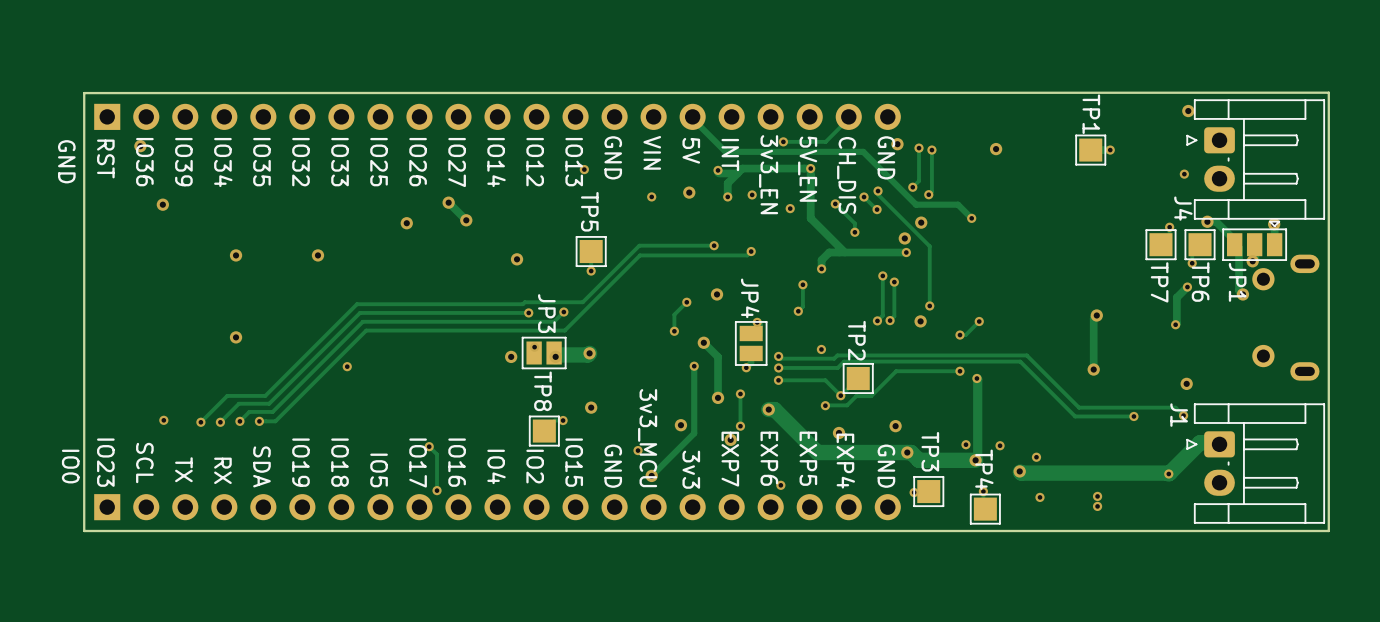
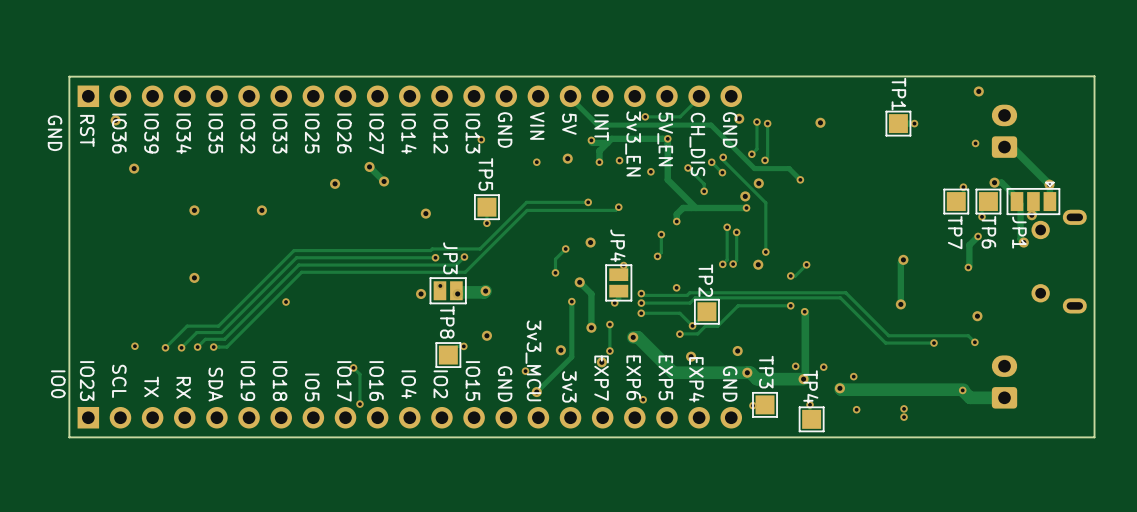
J4 side: bottom (1255, 159) -> top (1004, 131)
track: none -> (1004, 147) (1011, 147) (1049, 184)
track: (1215, 442) (1200, 442) (1168, 473) -> (1004, 397) (970, 397) (962, 390)
J1 side: bottom (1255, 463) -> top (1004, 382)

